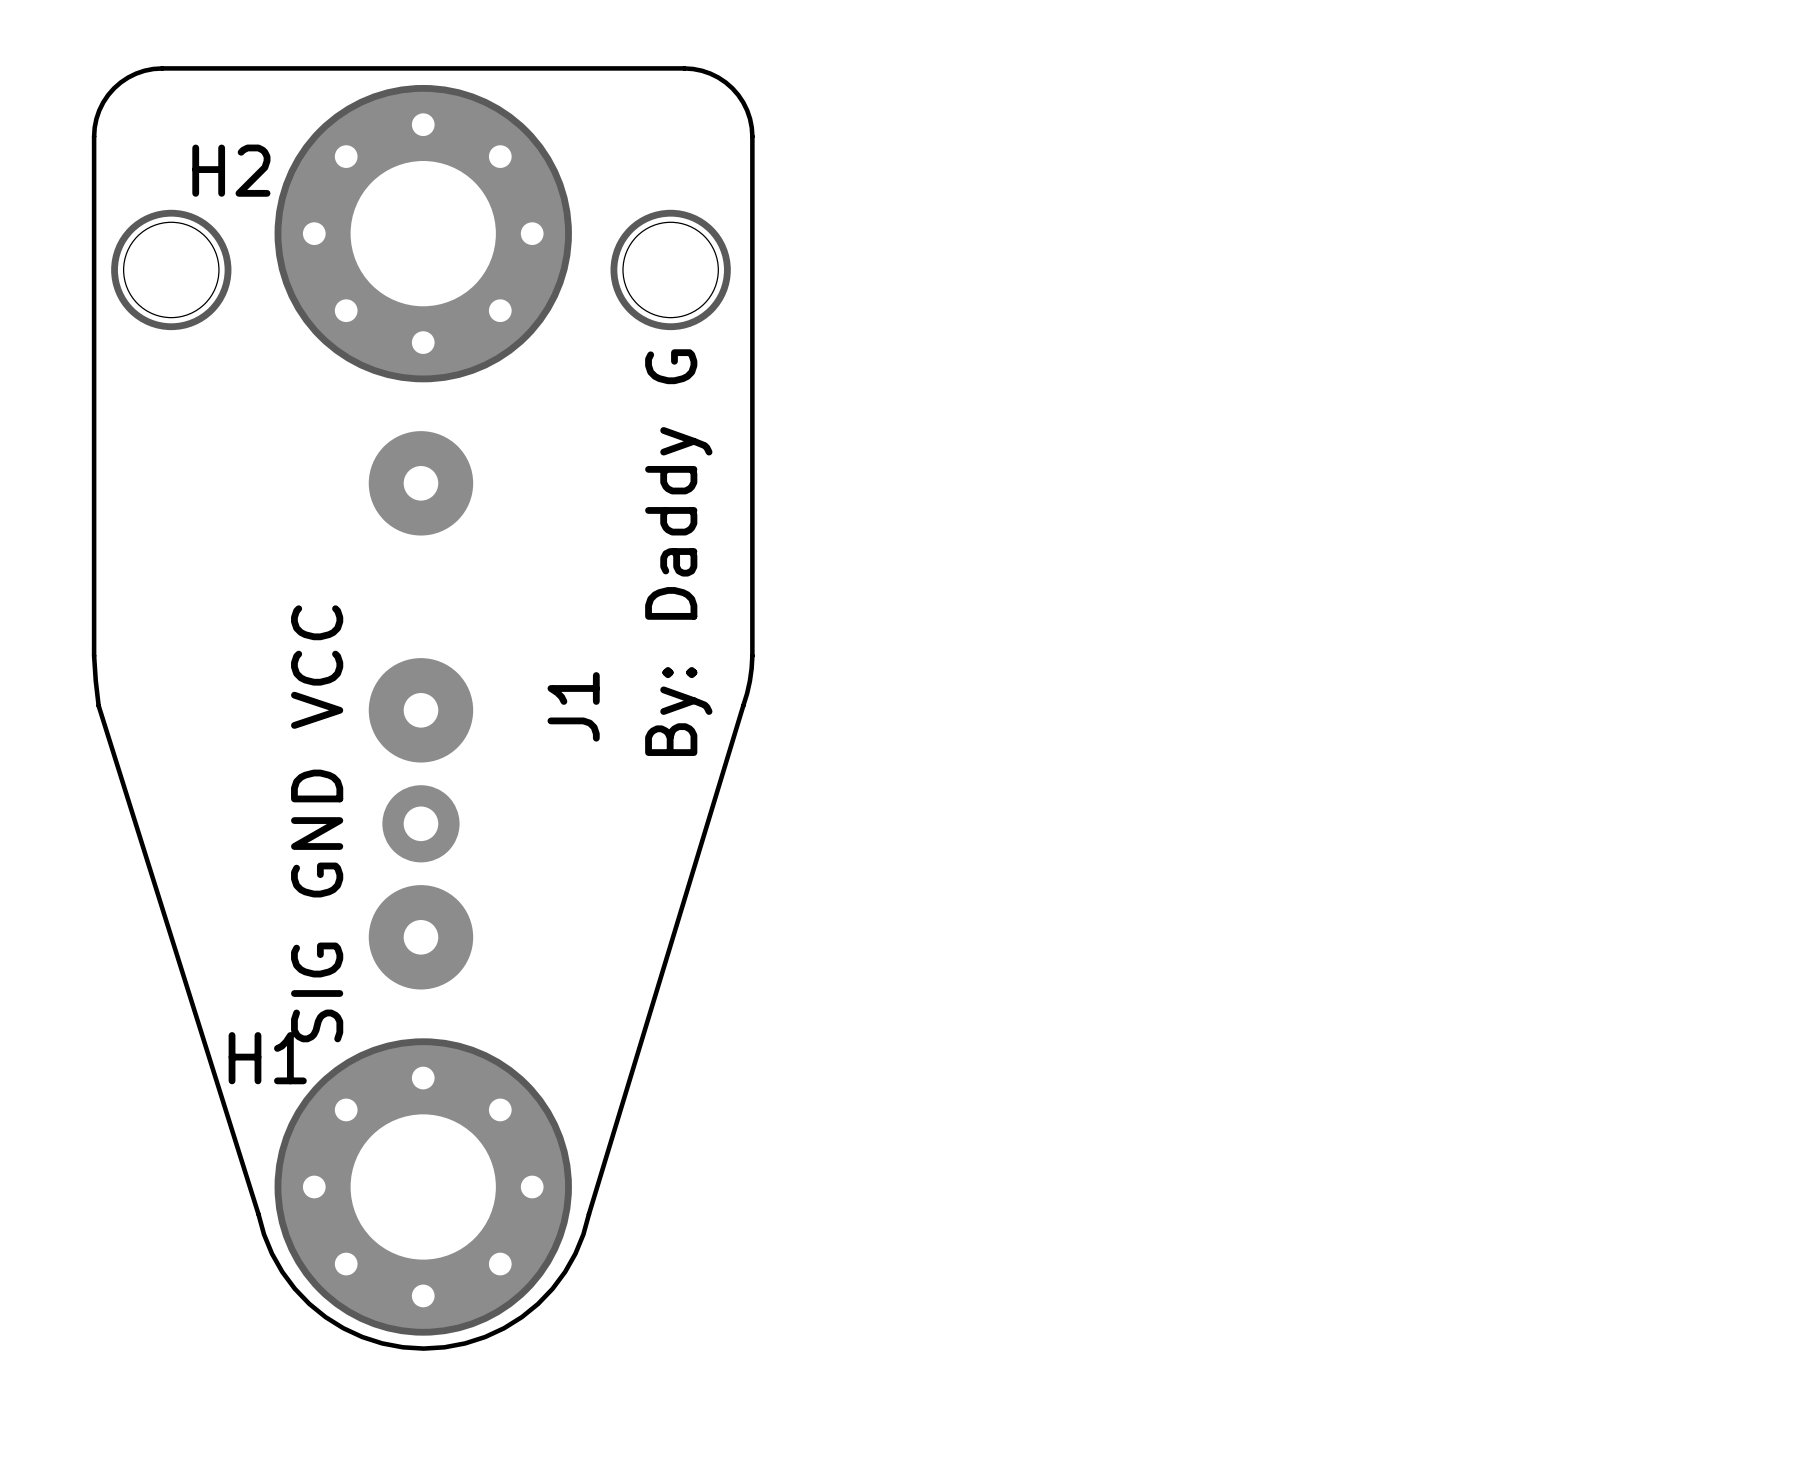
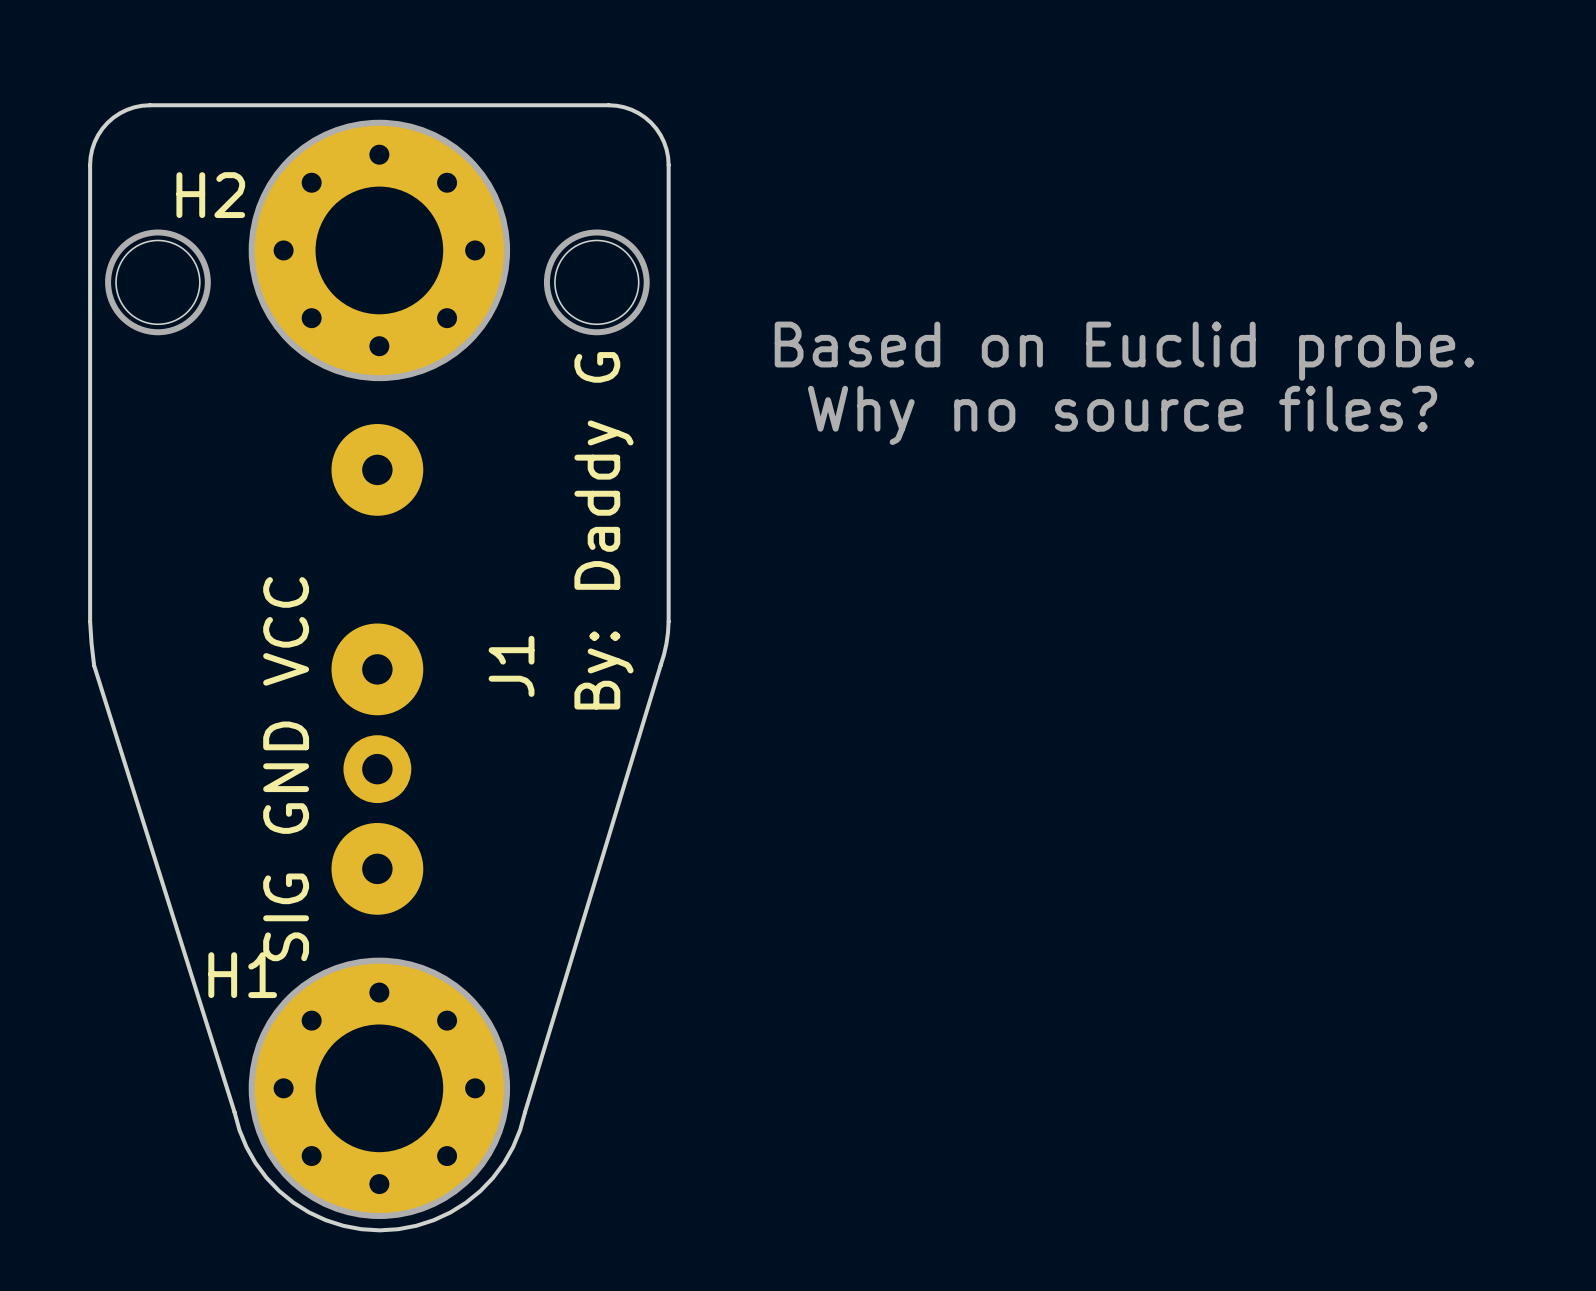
text: none -> Based on Euclid probe. (1124, 351)
text: none -> Why no source files? (1122, 415)

